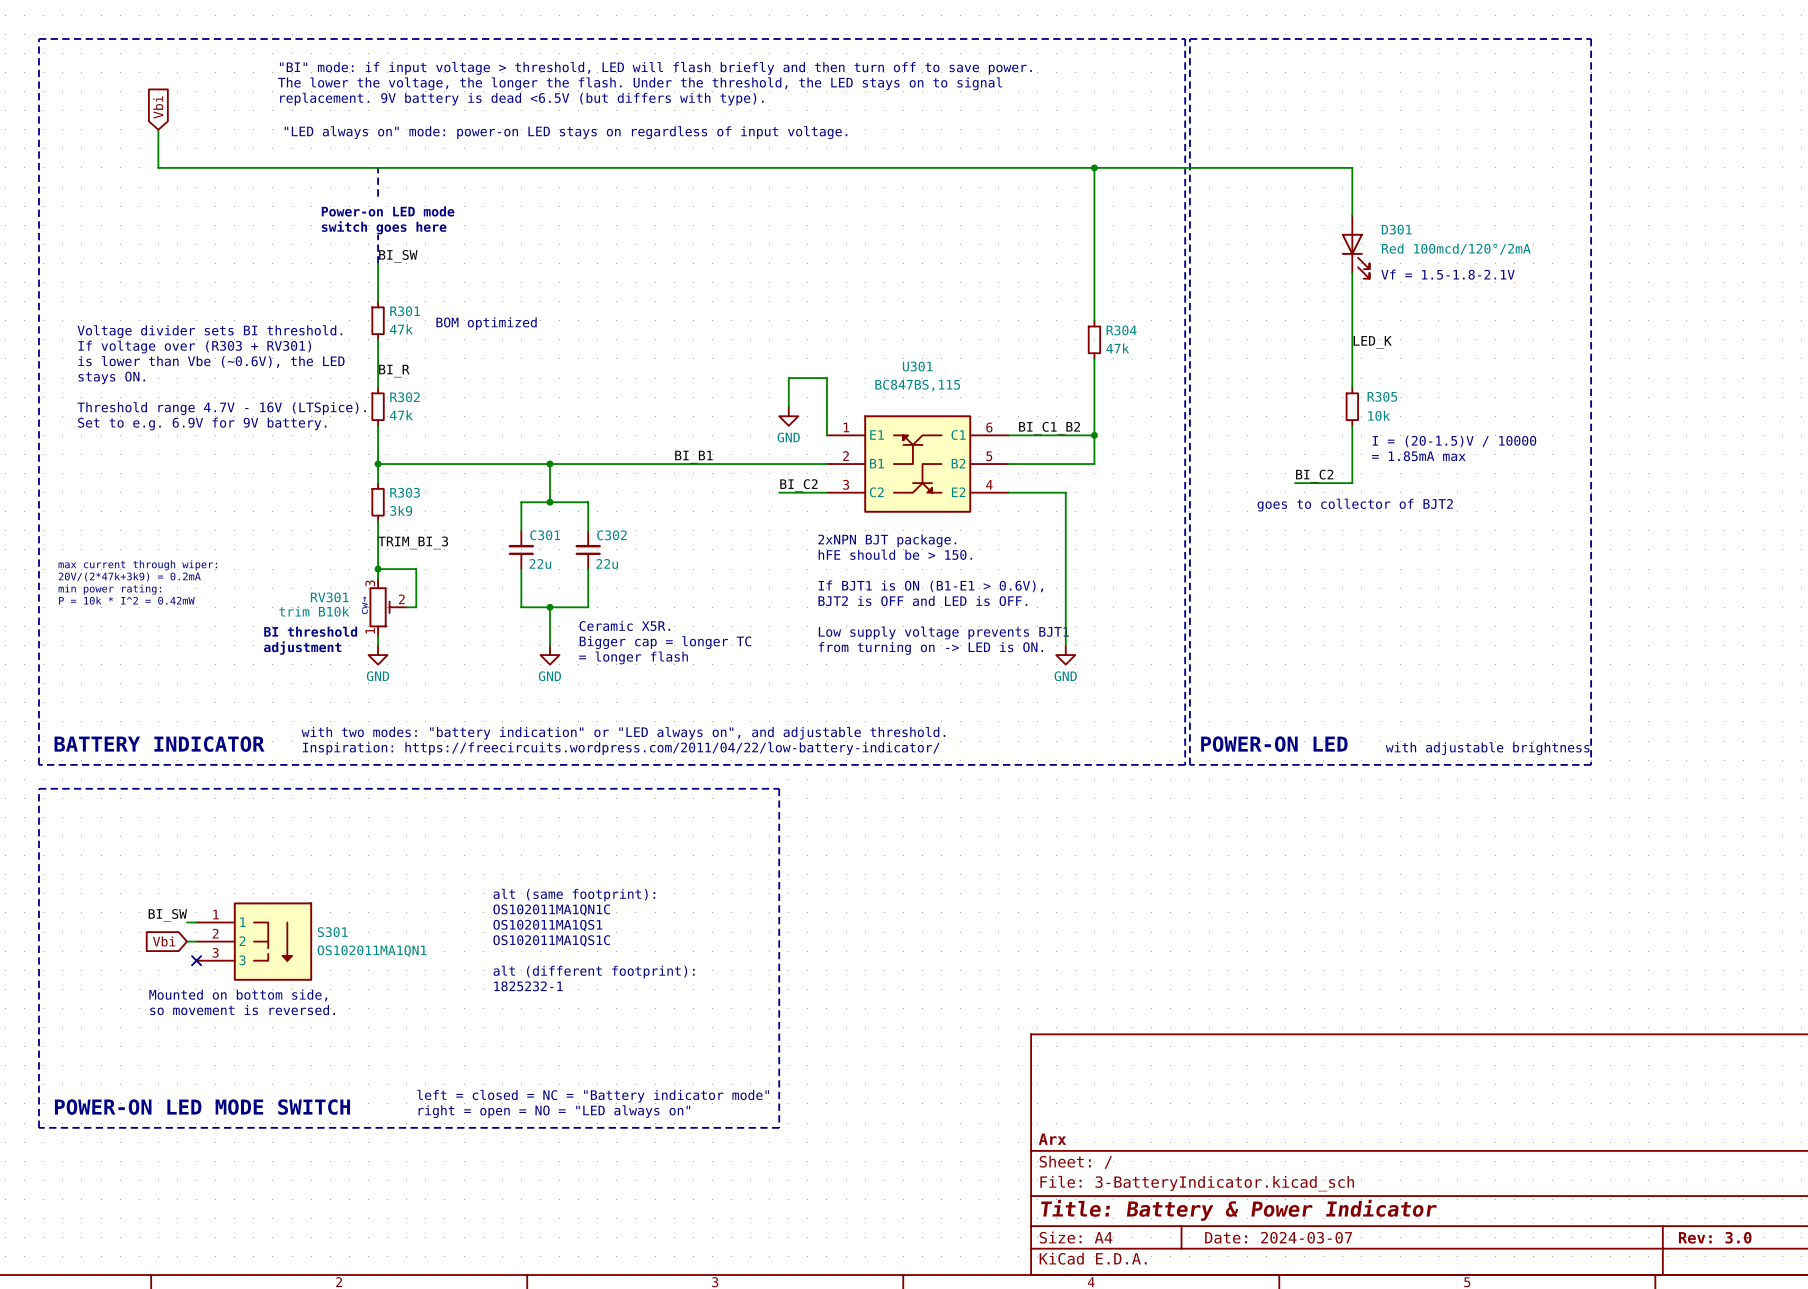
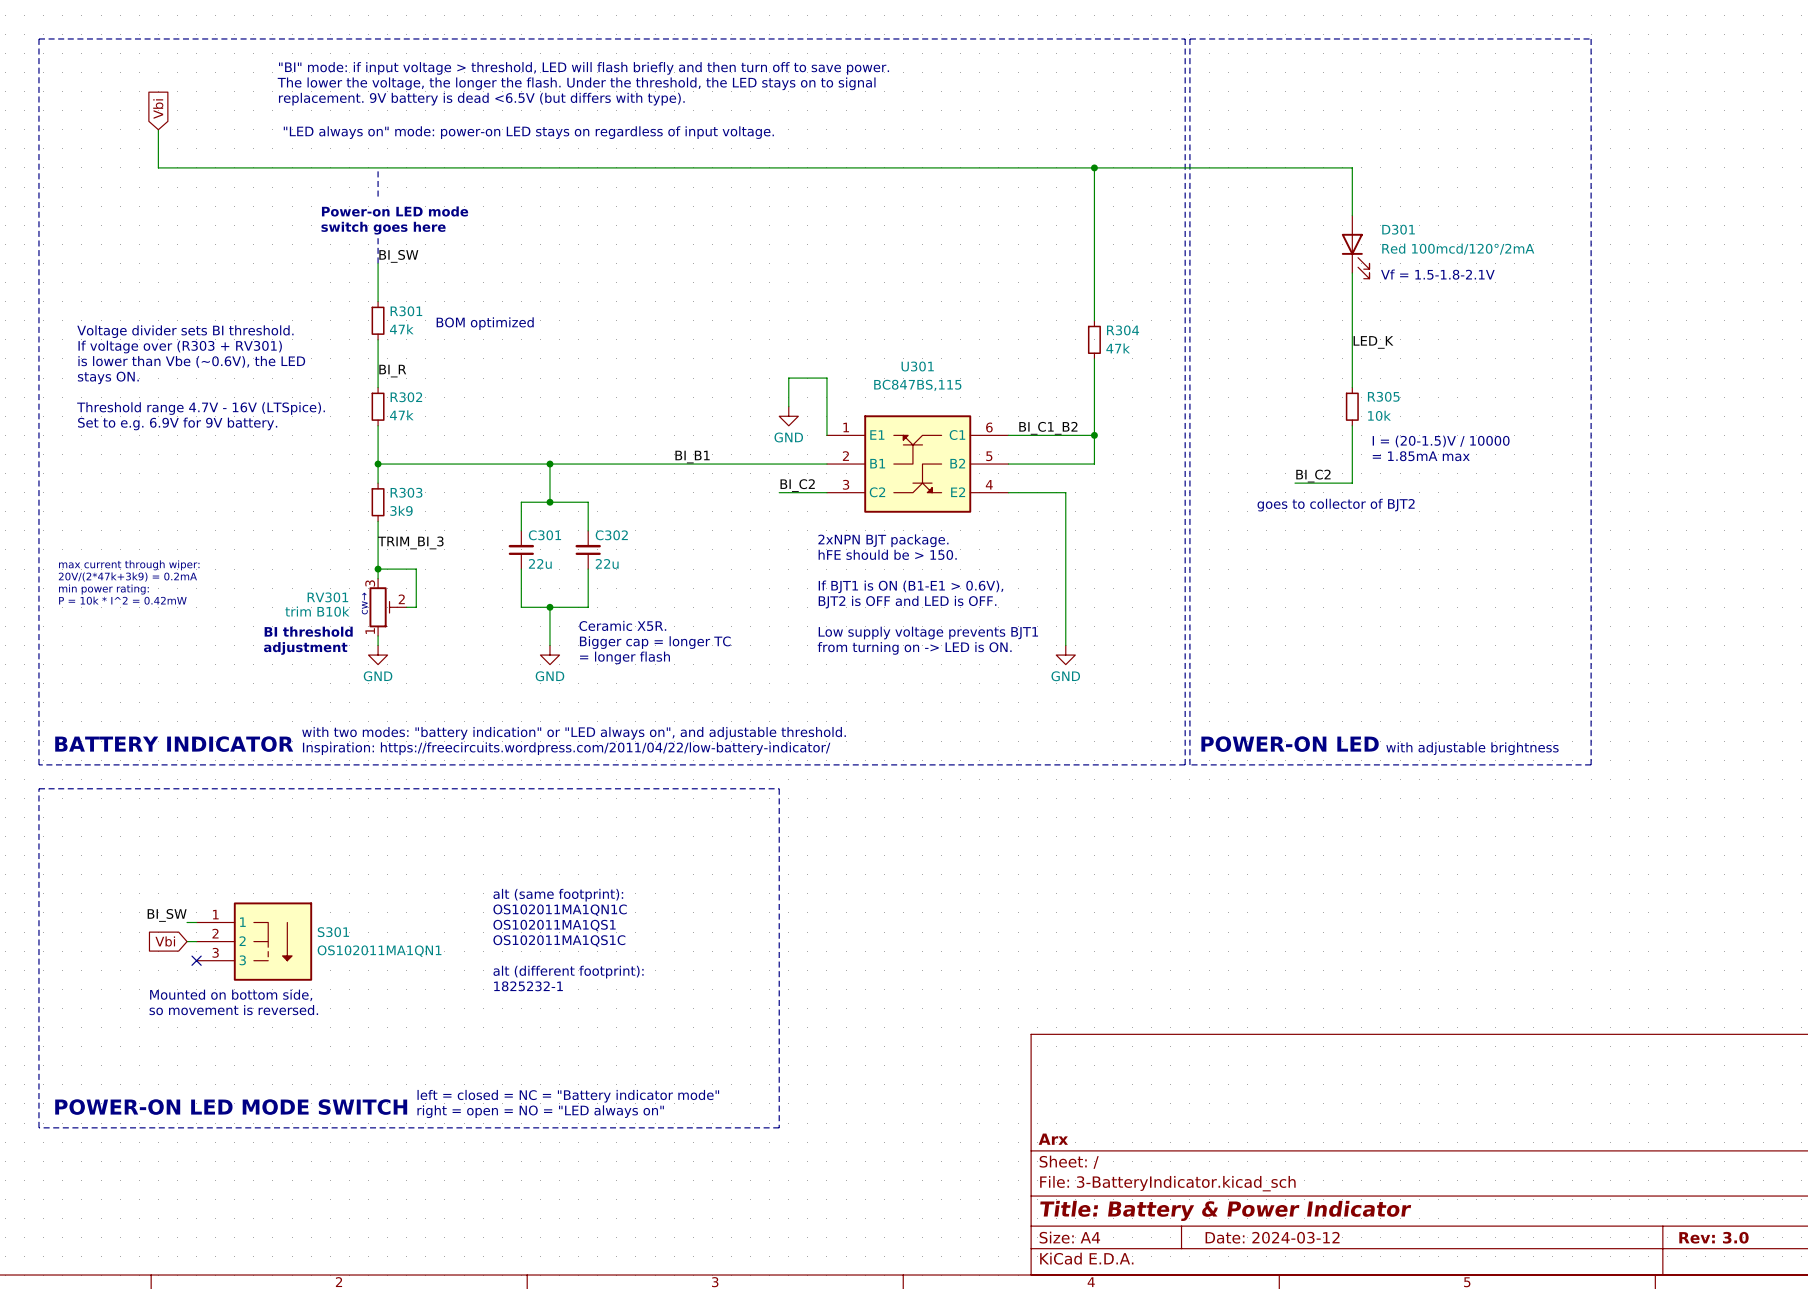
title block: Date: 2024-03-07 (1278, 1237) -> Date: 2024-03-12 (1272, 1237)

